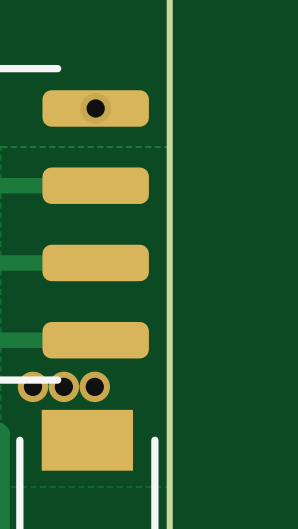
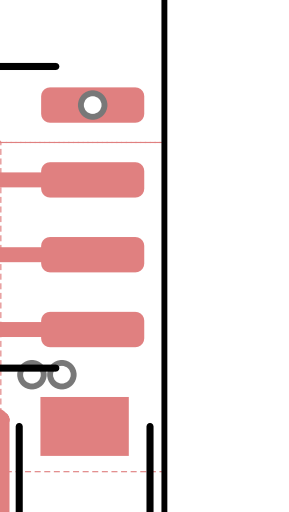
via: (94, 386) -> none

